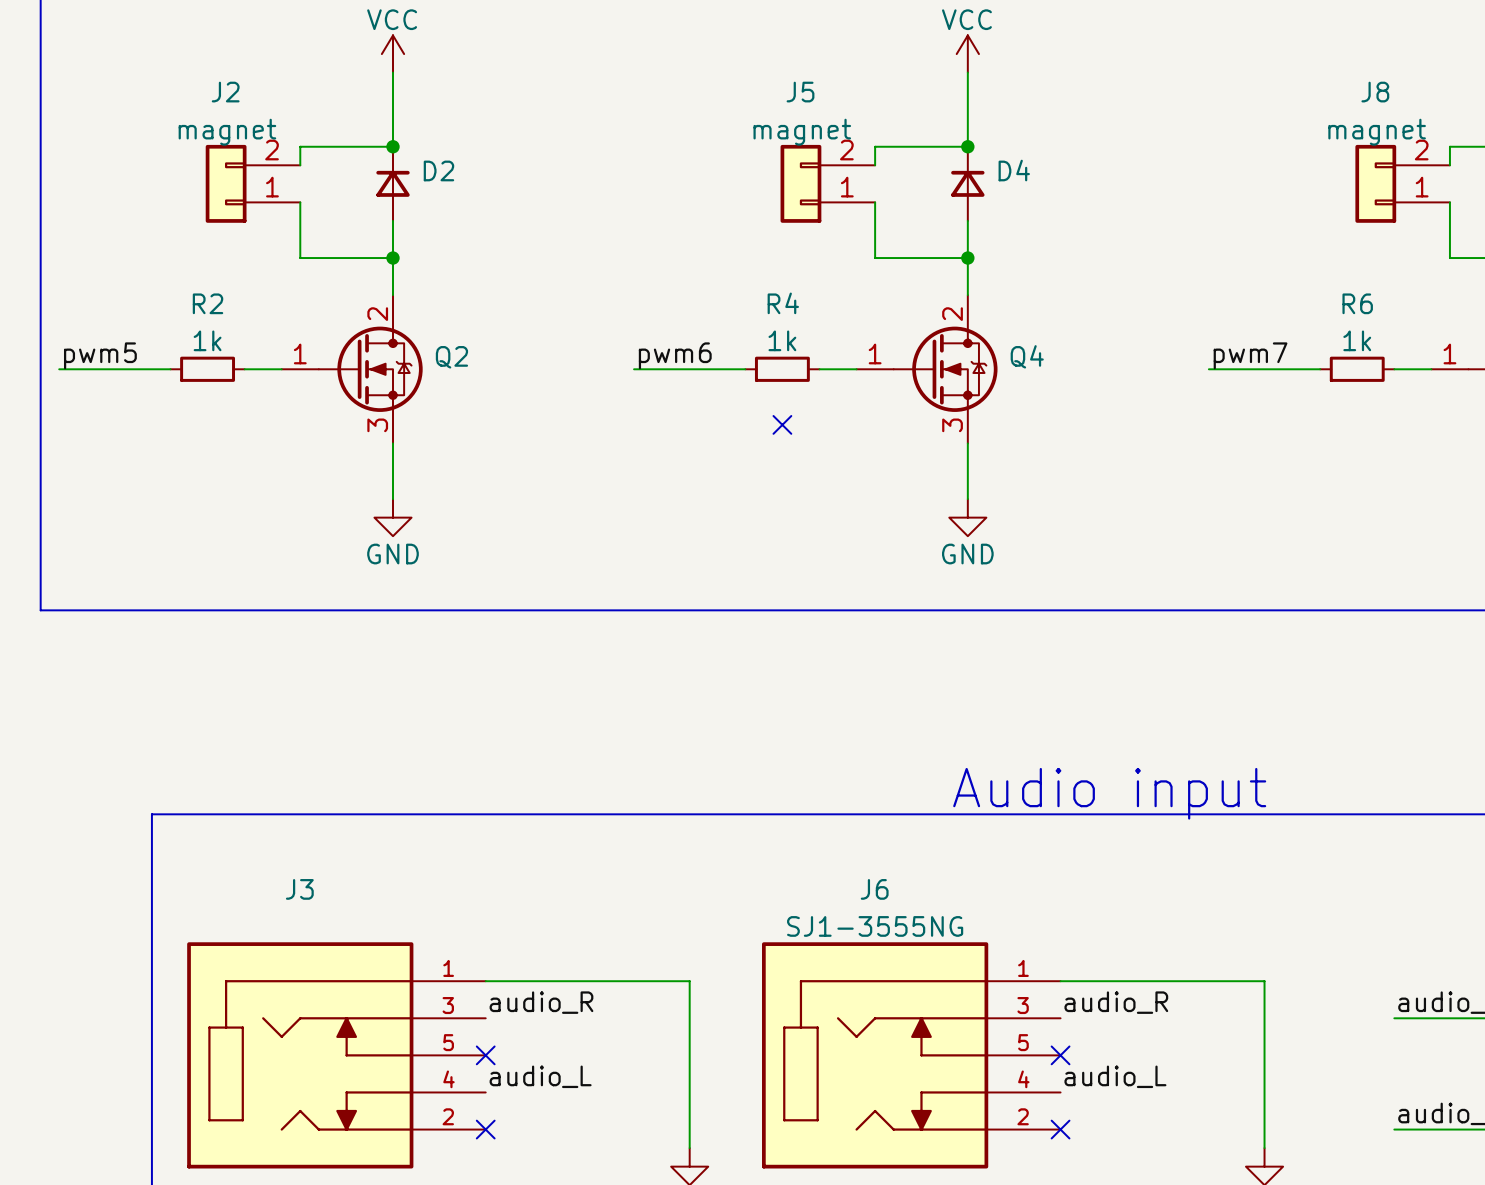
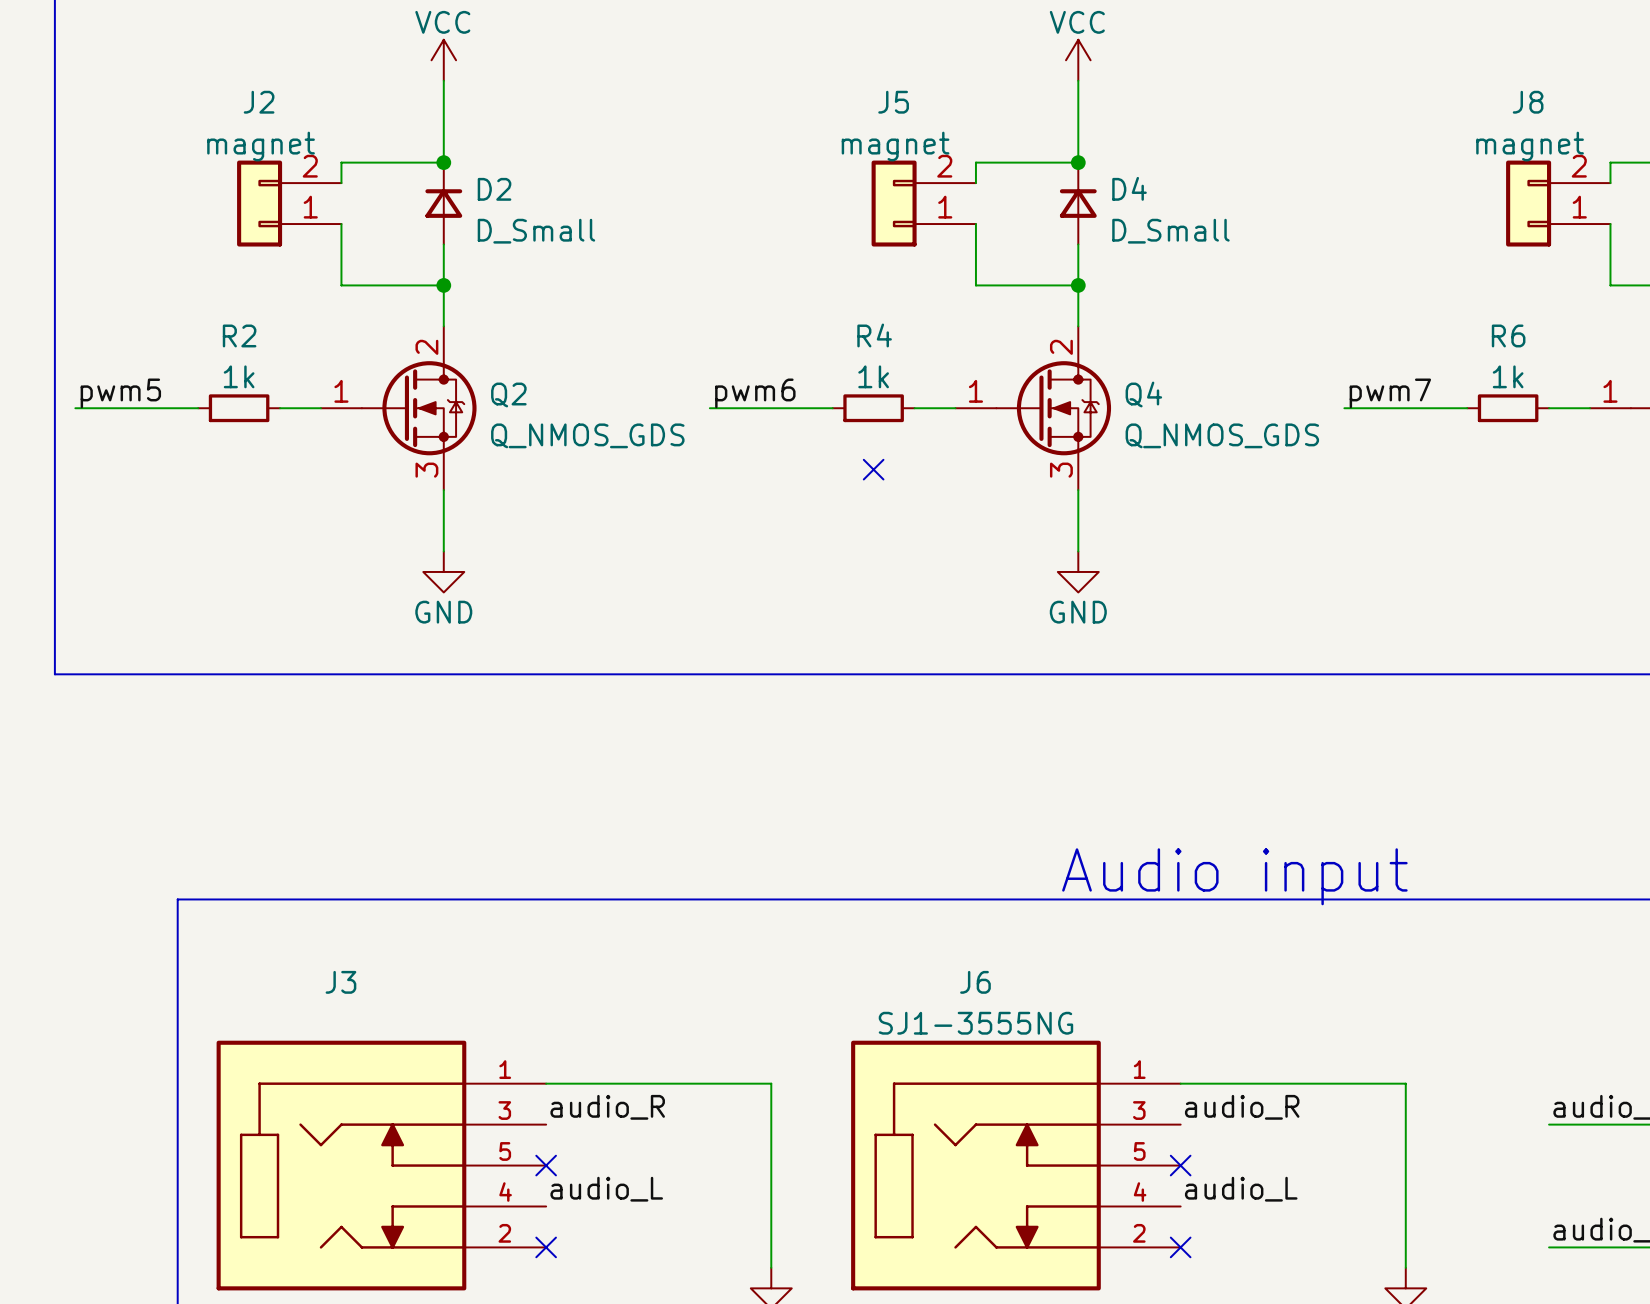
D2 value: none -> D_Small (536, 231)
D4 value: none -> D_Small (1170, 231)
Q2 value: none -> Q_NMOS_GDS (587, 435)
Q4 value: none -> Q_NMOS_GDS (1222, 435)

